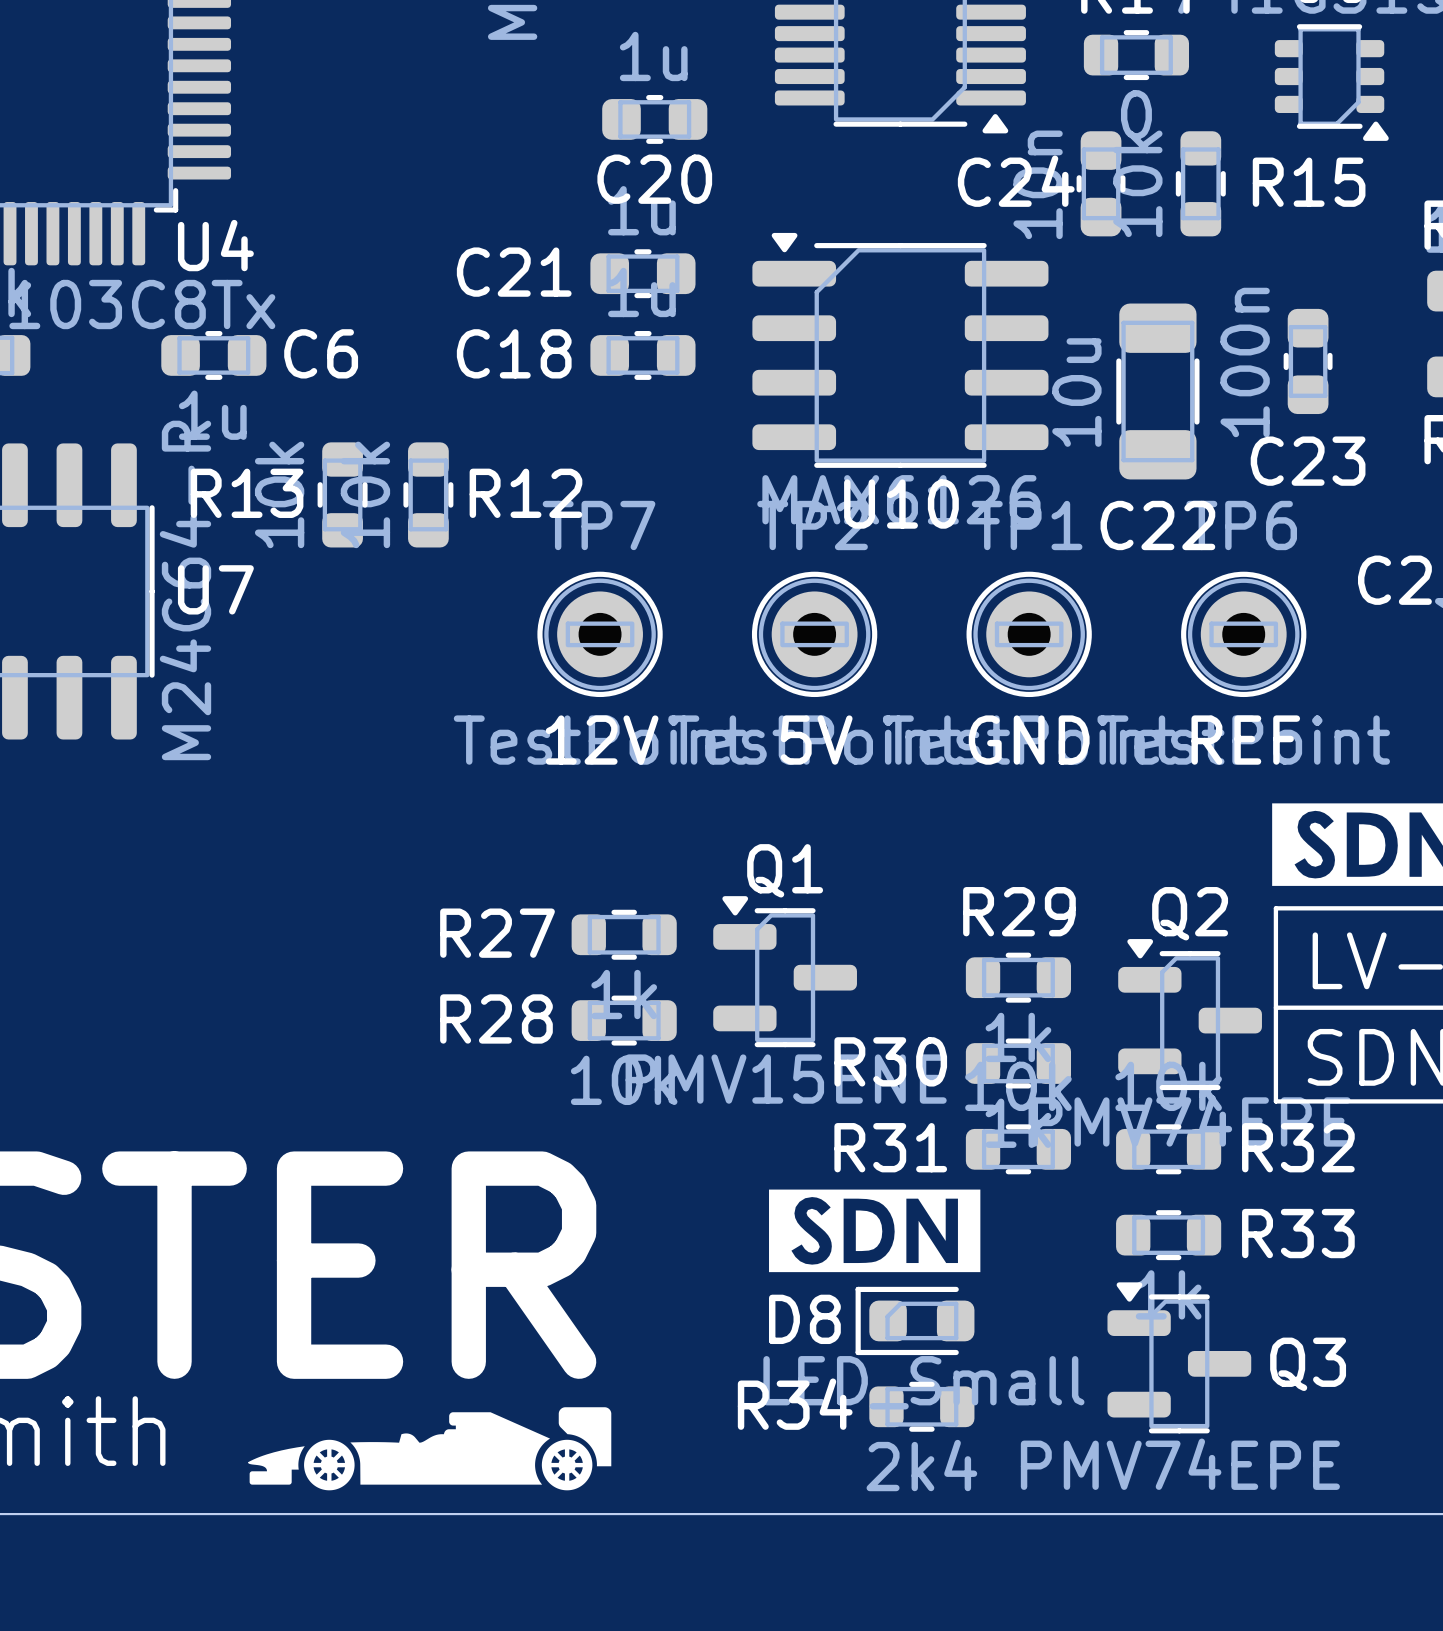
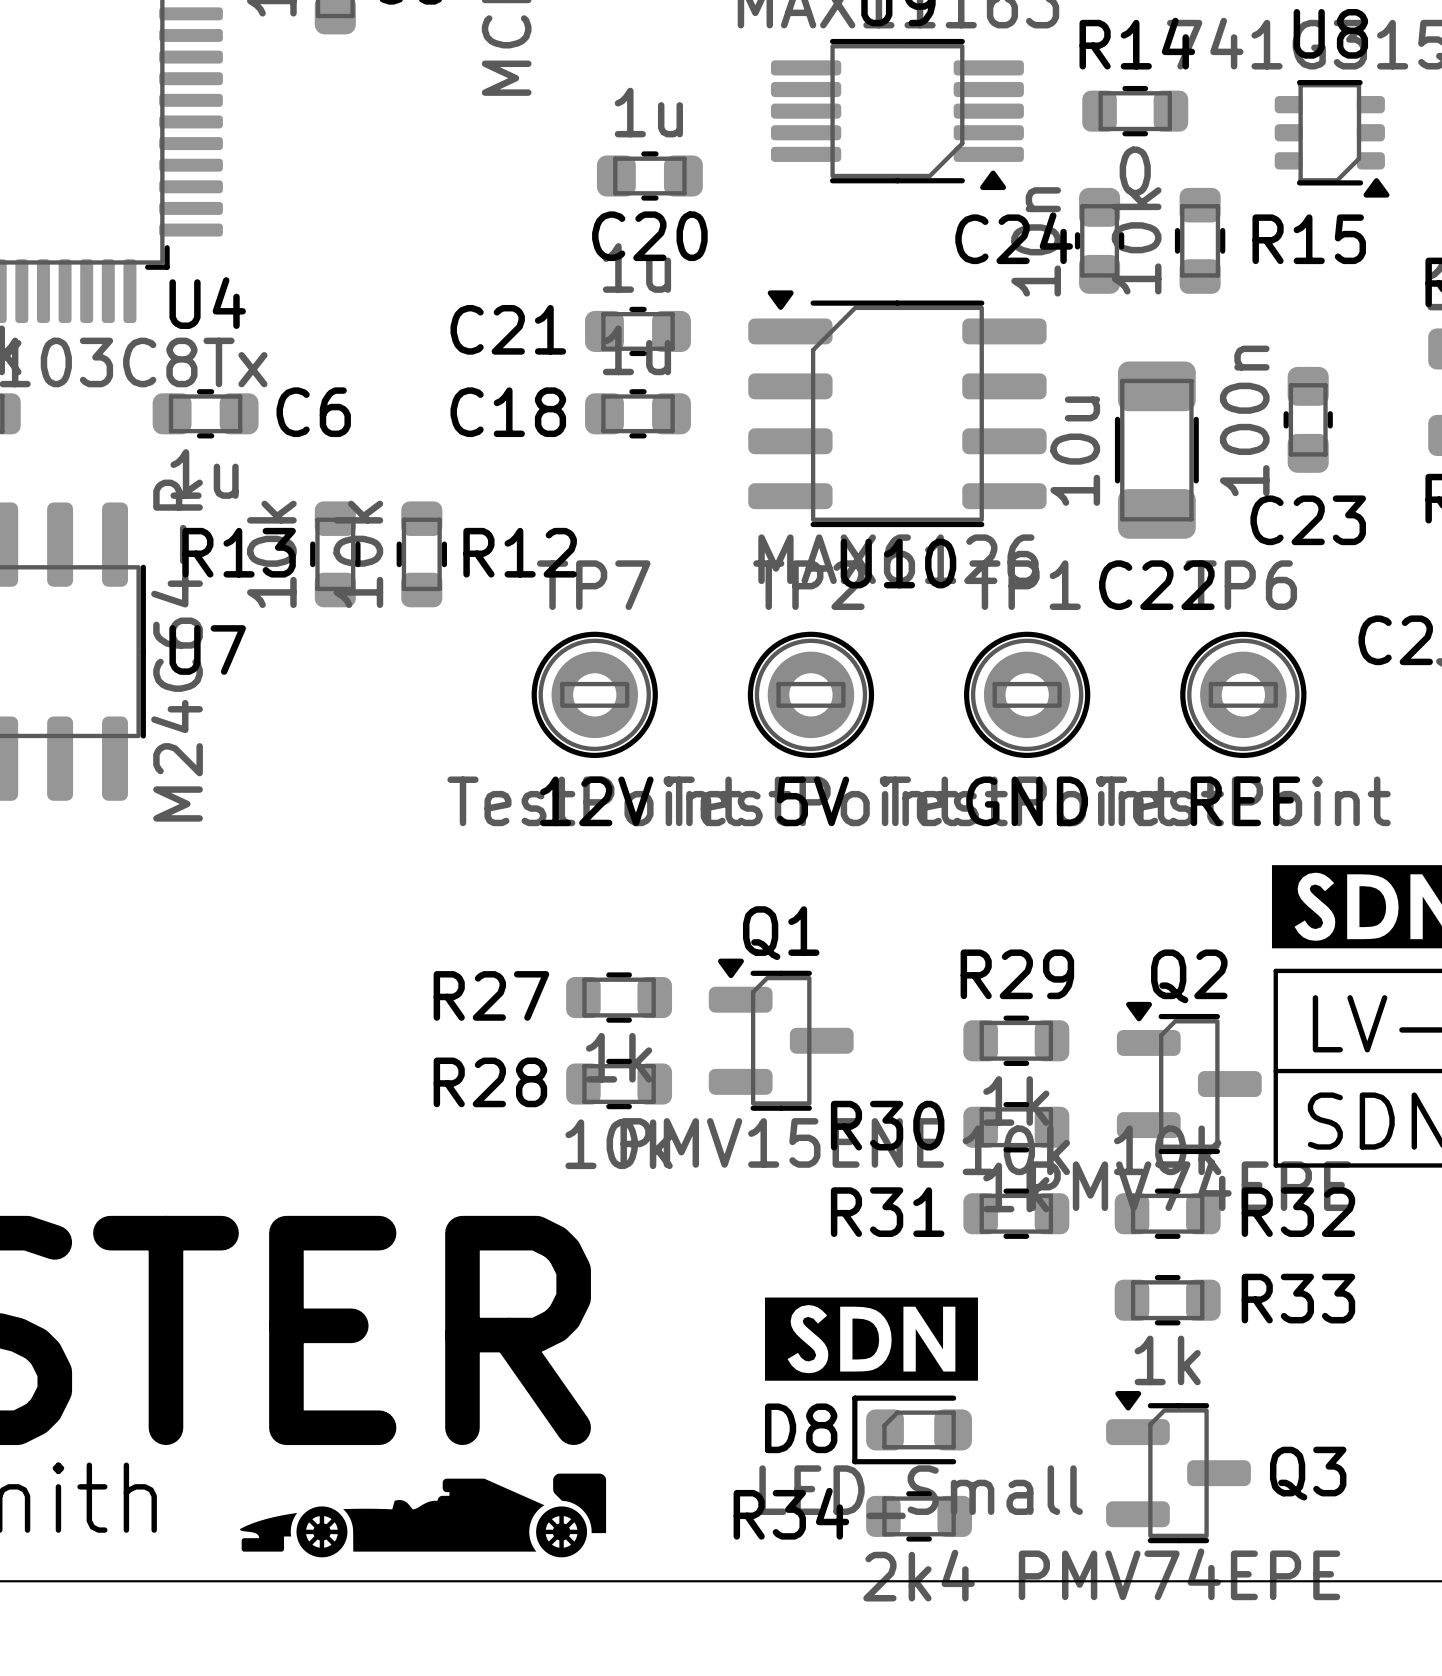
drawing position: (874, 1230) -> (871, 1339)
D8 position: (915, 1320) -> (912, 1429)
Q3 position: (1179, 1357) -> (1178, 1467)
R34 position: (921, 1406) -> (919, 1516)

